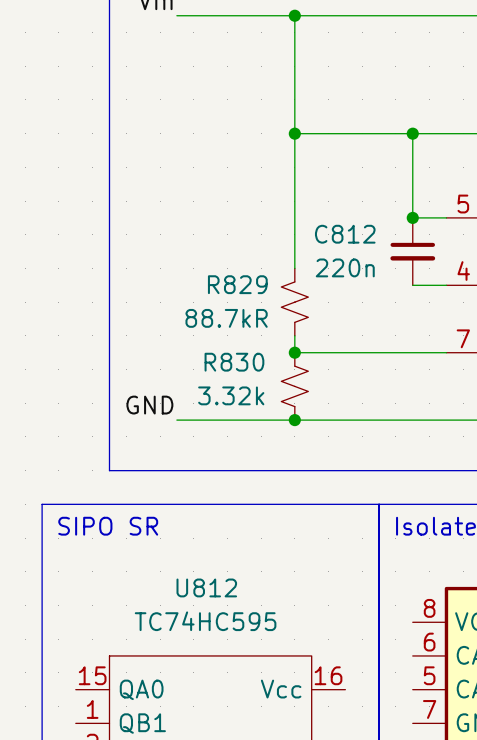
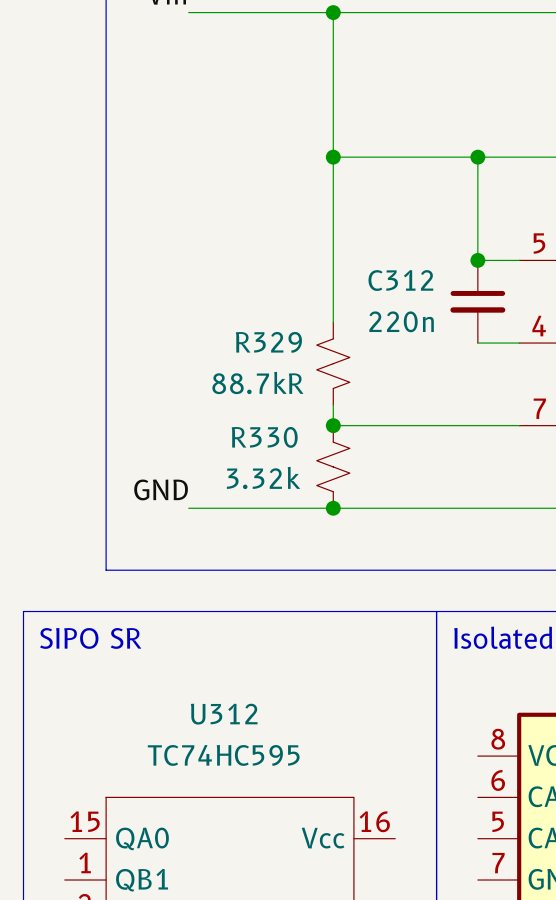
C812 name: C812 (345, 234) -> C312 (400, 280)
R829 name: R829 (237, 284) -> R329 (268, 342)
R830 name: R830 (234, 362) -> R330 (264, 437)
U812 name: U812 (206, 587) -> U312 (224, 714)

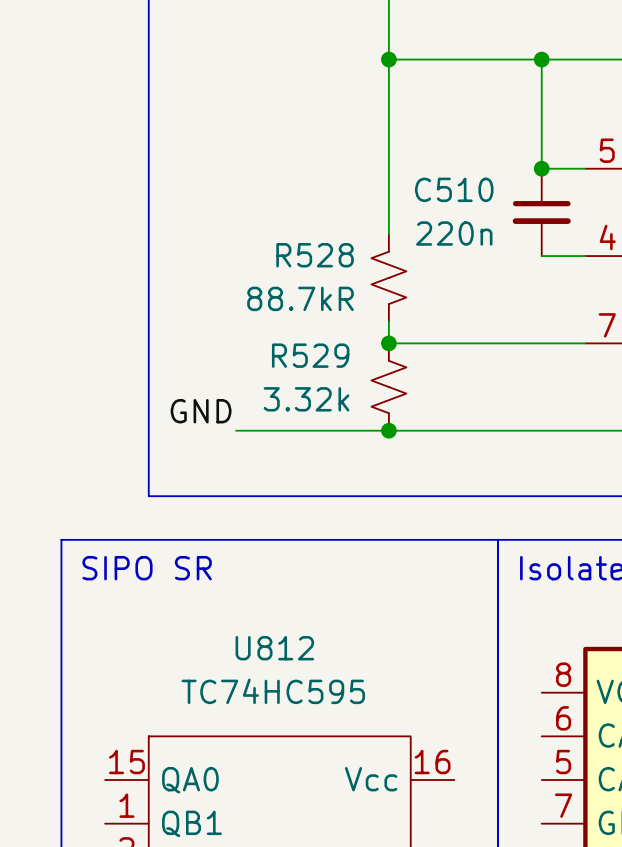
C312 name: C312 (400, 280) -> C510 (454, 189)
R329 name: R329 (268, 342) -> R528 (315, 255)
R330 name: R330 (264, 437) -> R529 (310, 355)
U312 name: U312 (224, 714) -> U812 (274, 648)

